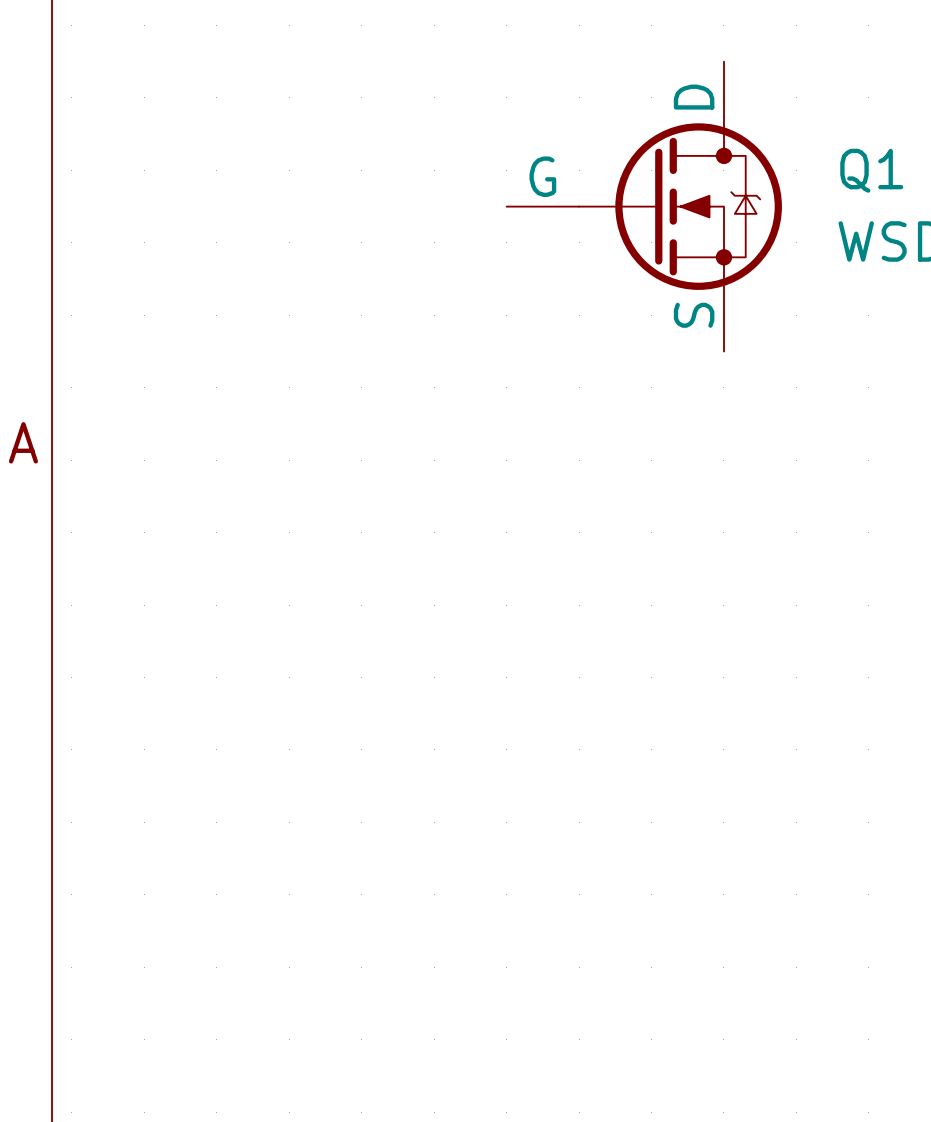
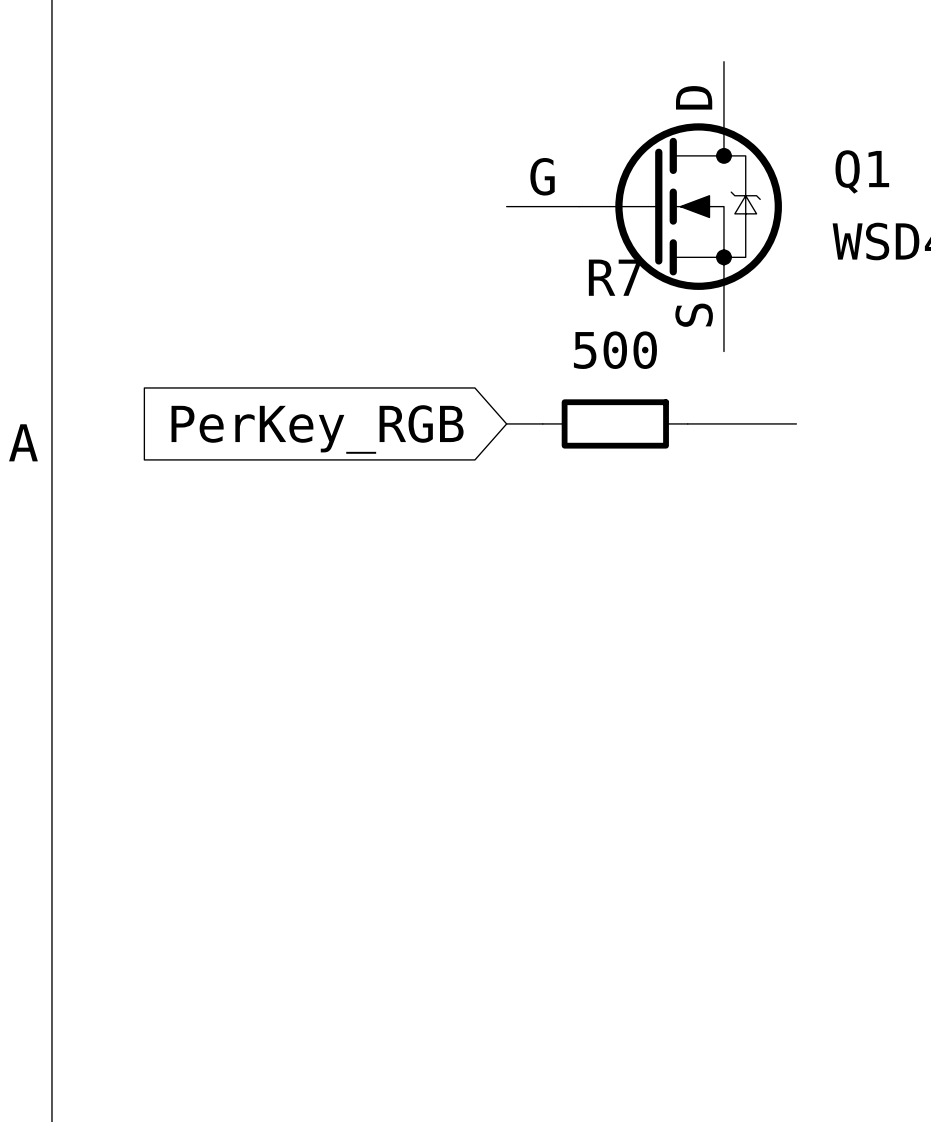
wire: none -> (506, 423) (542, 423)
R7: none -> 500 (615, 423)
wire: none -> (687, 423) (796, 423)
global label: none -> PerKey_RGB (317, 429)

